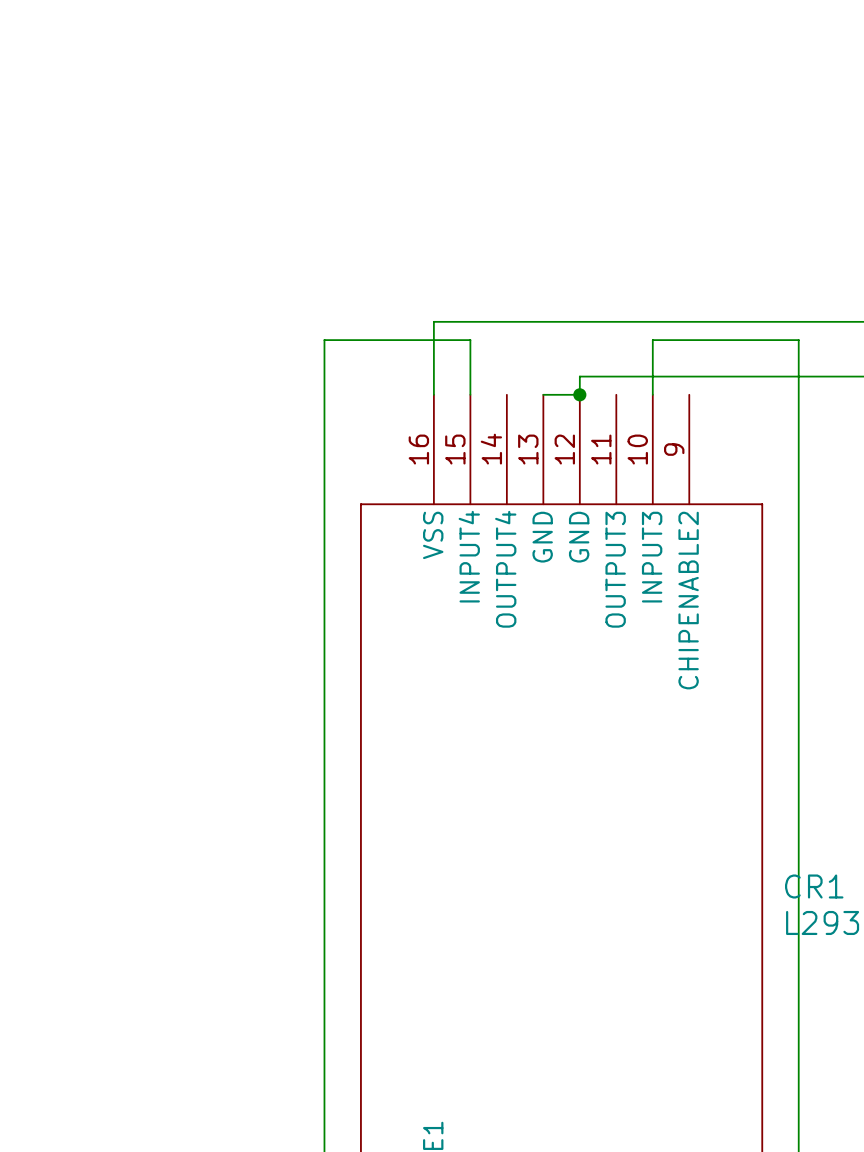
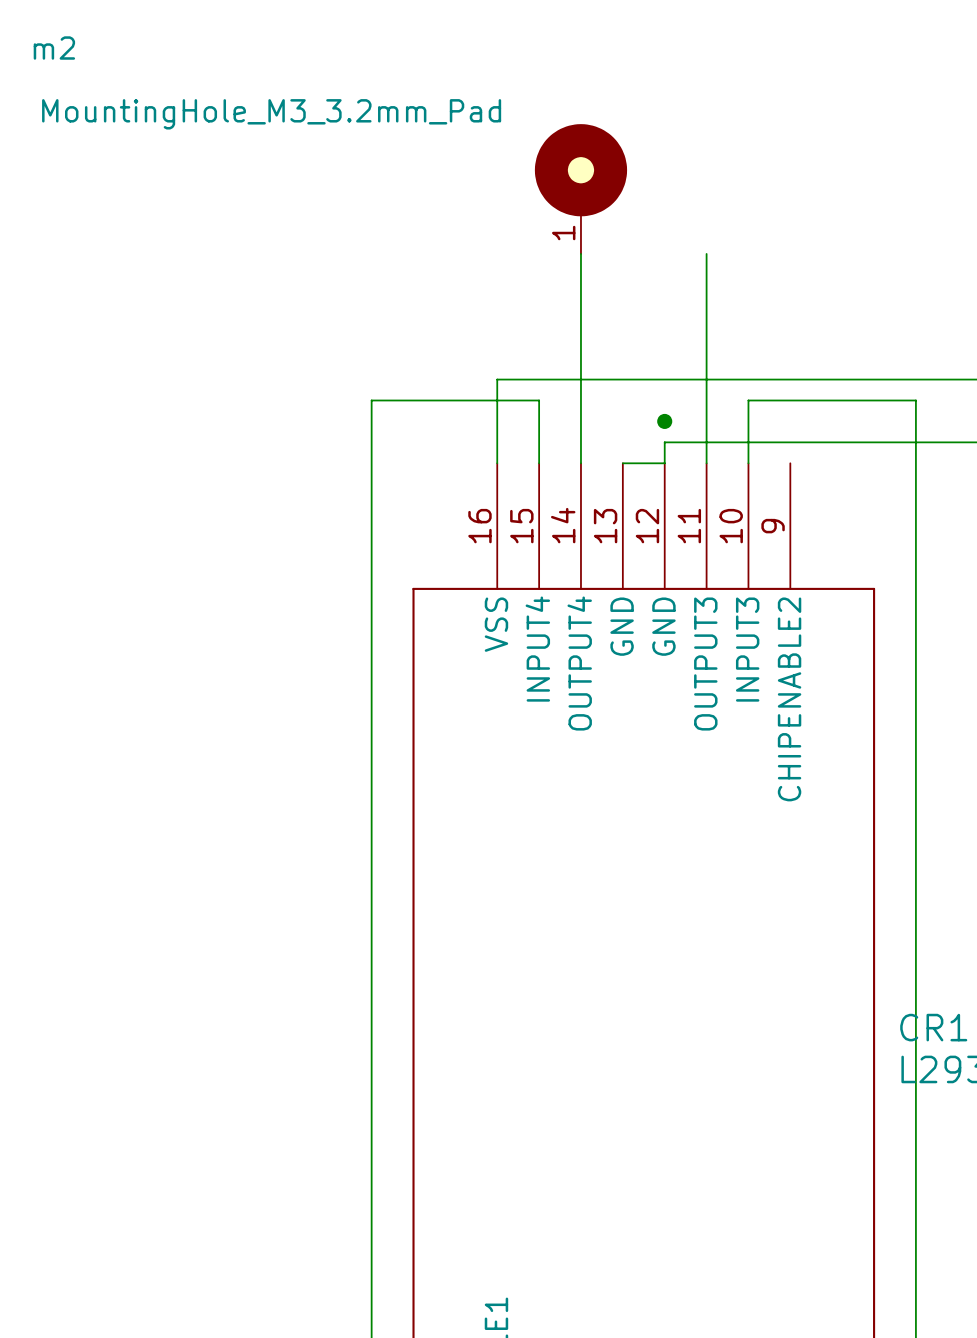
m2: none -> MountingHole_M3_3.2mm_Pad (580, 189)
wire: none -> (580, 253) (580, 463)
wire: none -> (706, 253) (706, 463)
junction position: (579, 394) -> (664, 421)

